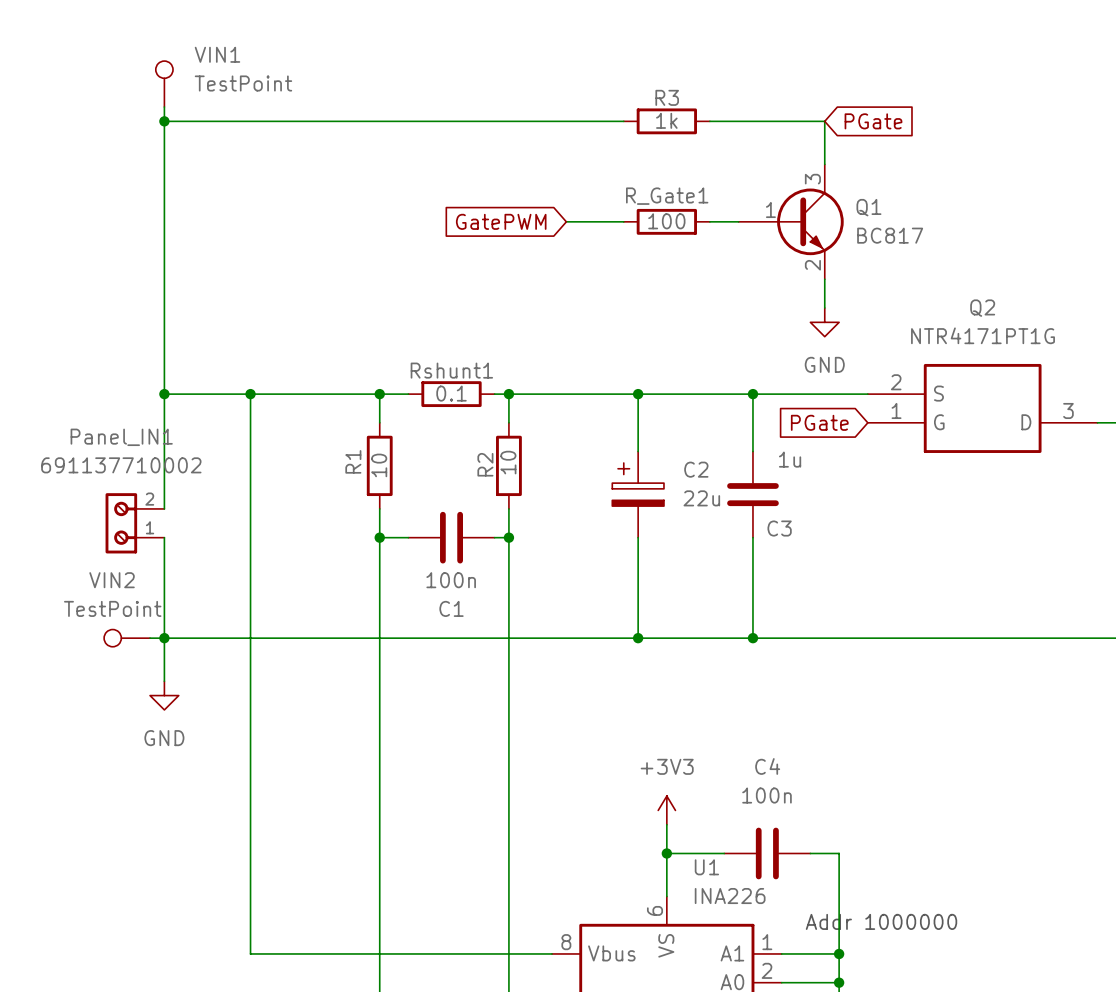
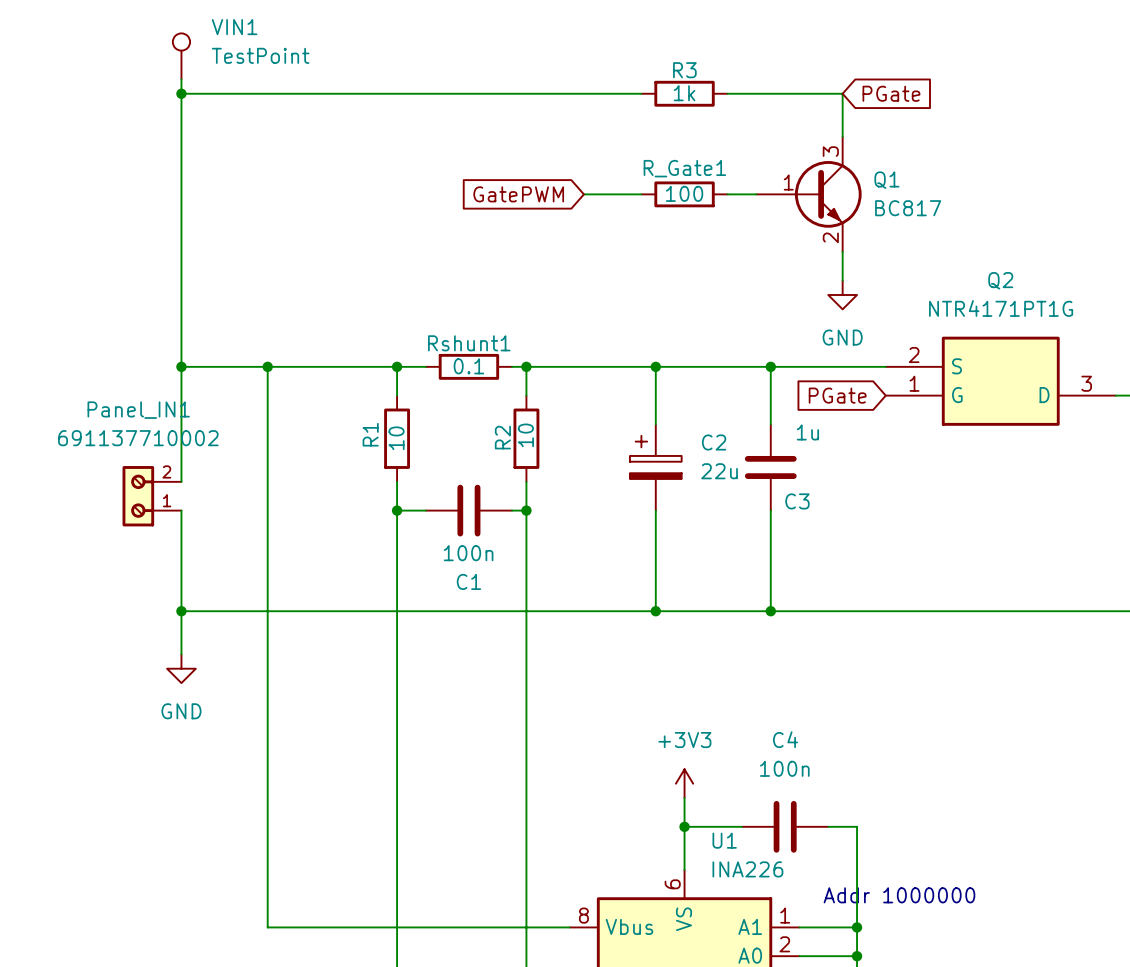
VIN2: TestPoint (127, 638) -> none
wire: (150, 638) (164, 638) -> none

